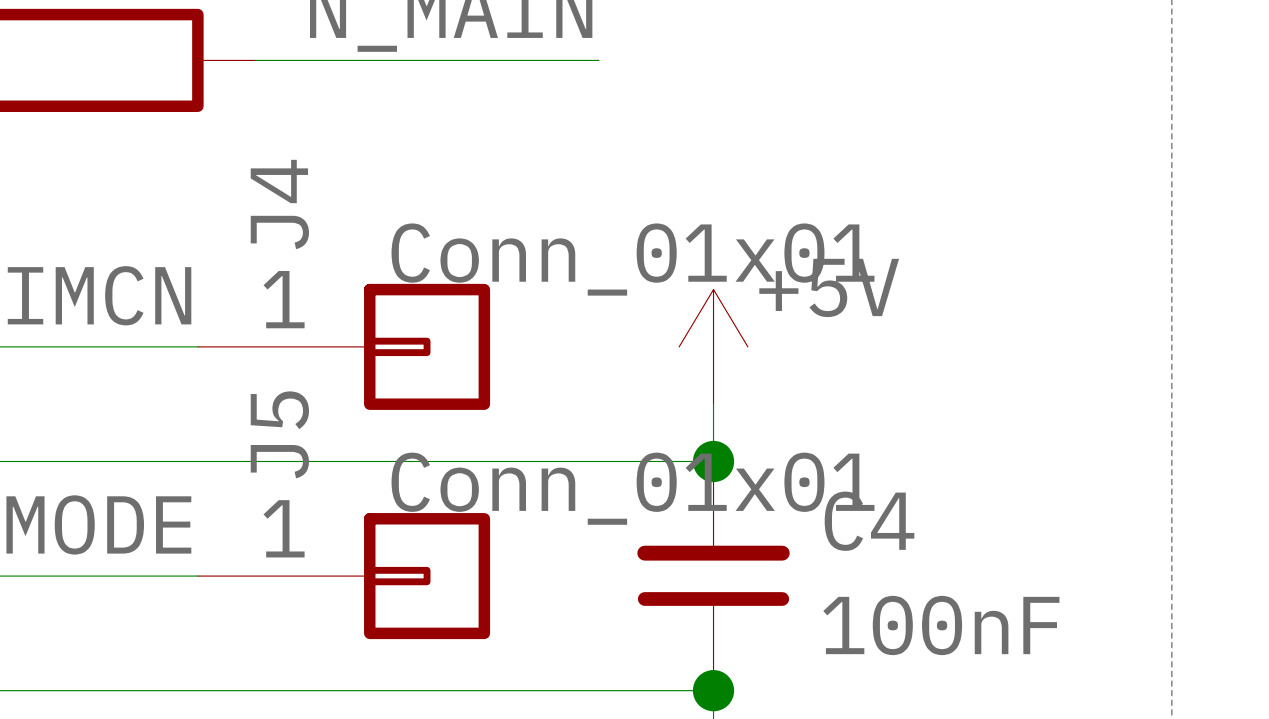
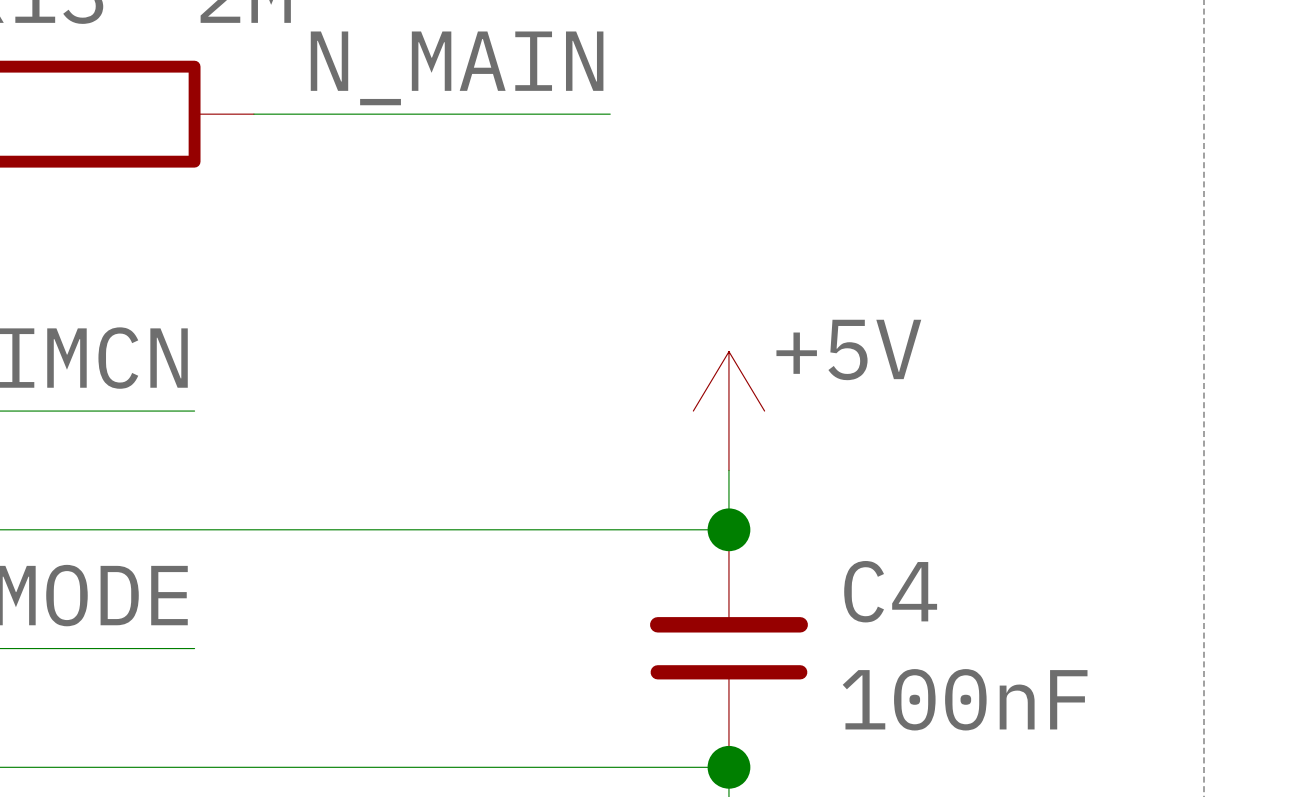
J4: Conn_01x01 (343, 346) -> none
J5: Conn_01x01 (343, 576) -> none

